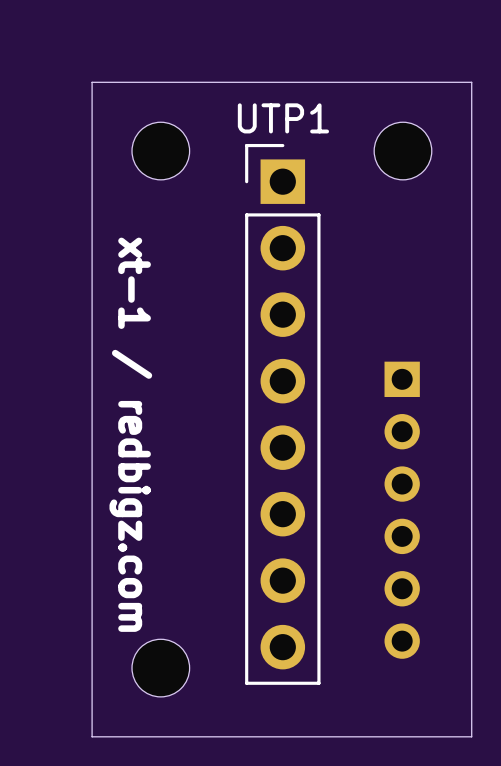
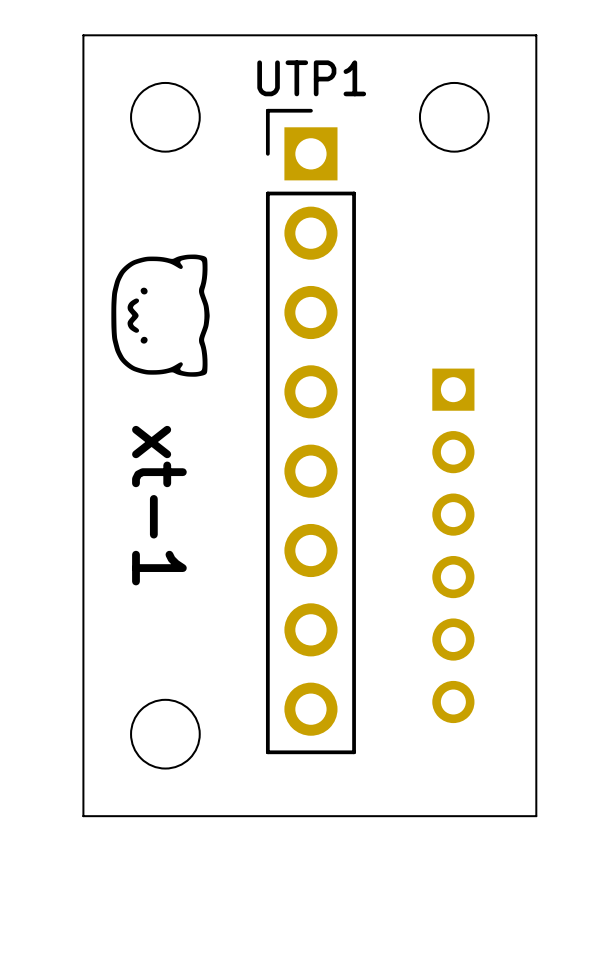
drawing: none -> [111, 254, 210, 377]
text: xt-1 / redbigz.com (130, 434) -> none
text: none -> xt-1 (159, 505)

